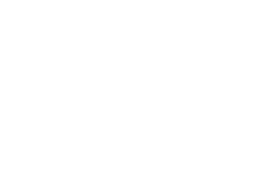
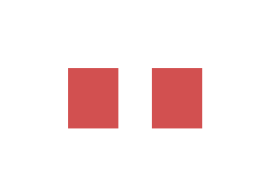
part: none -> (135, 98)

